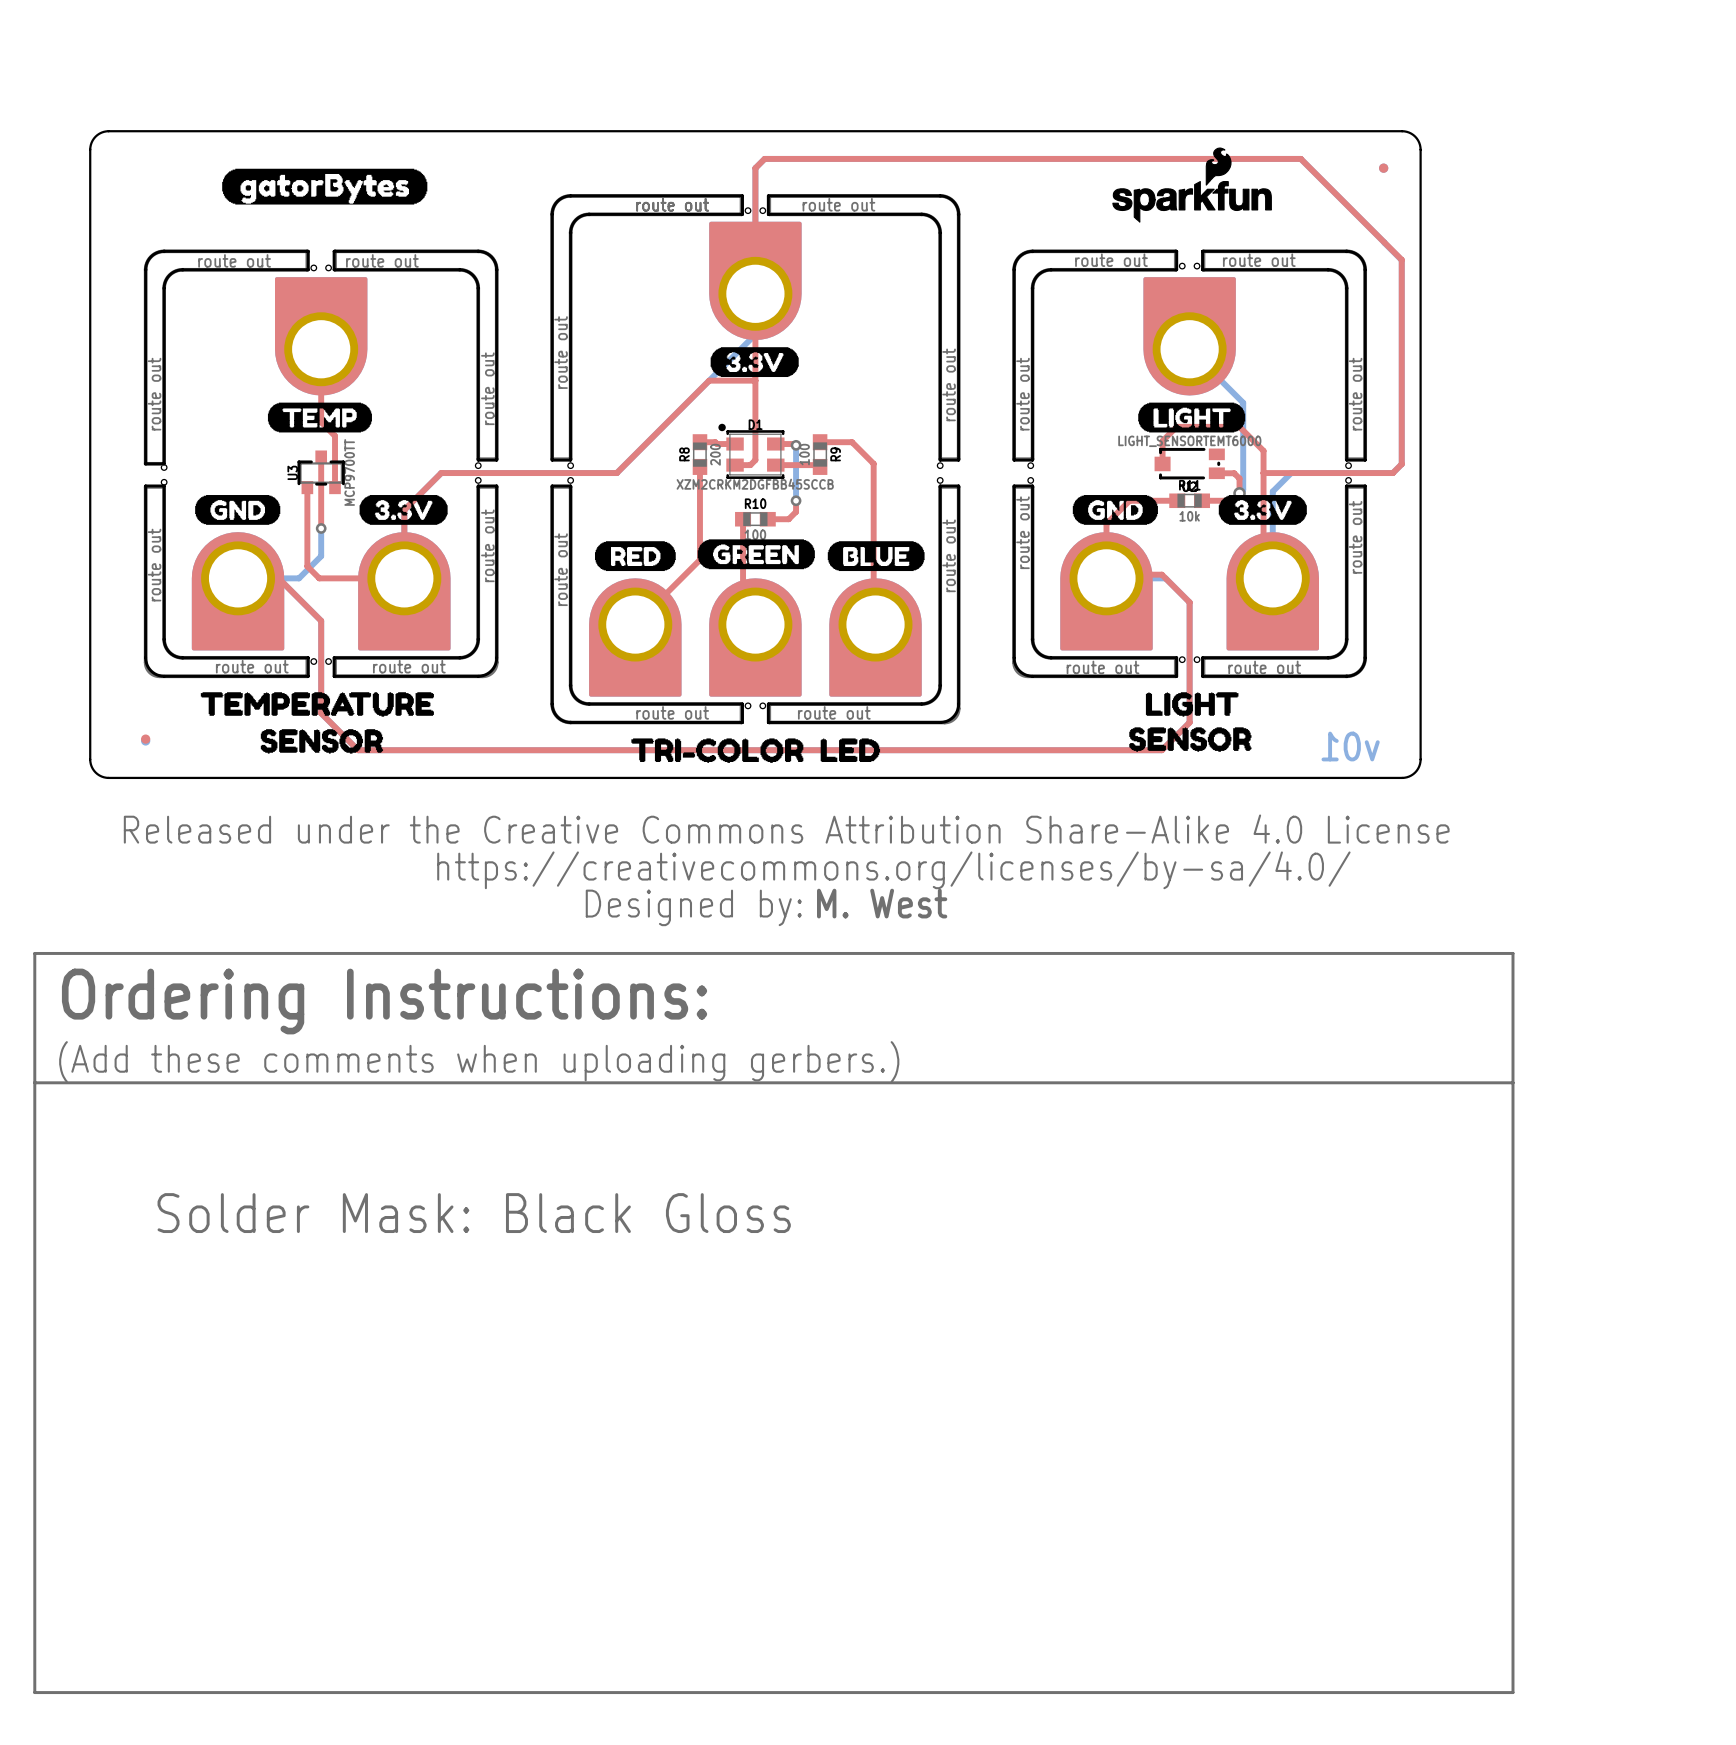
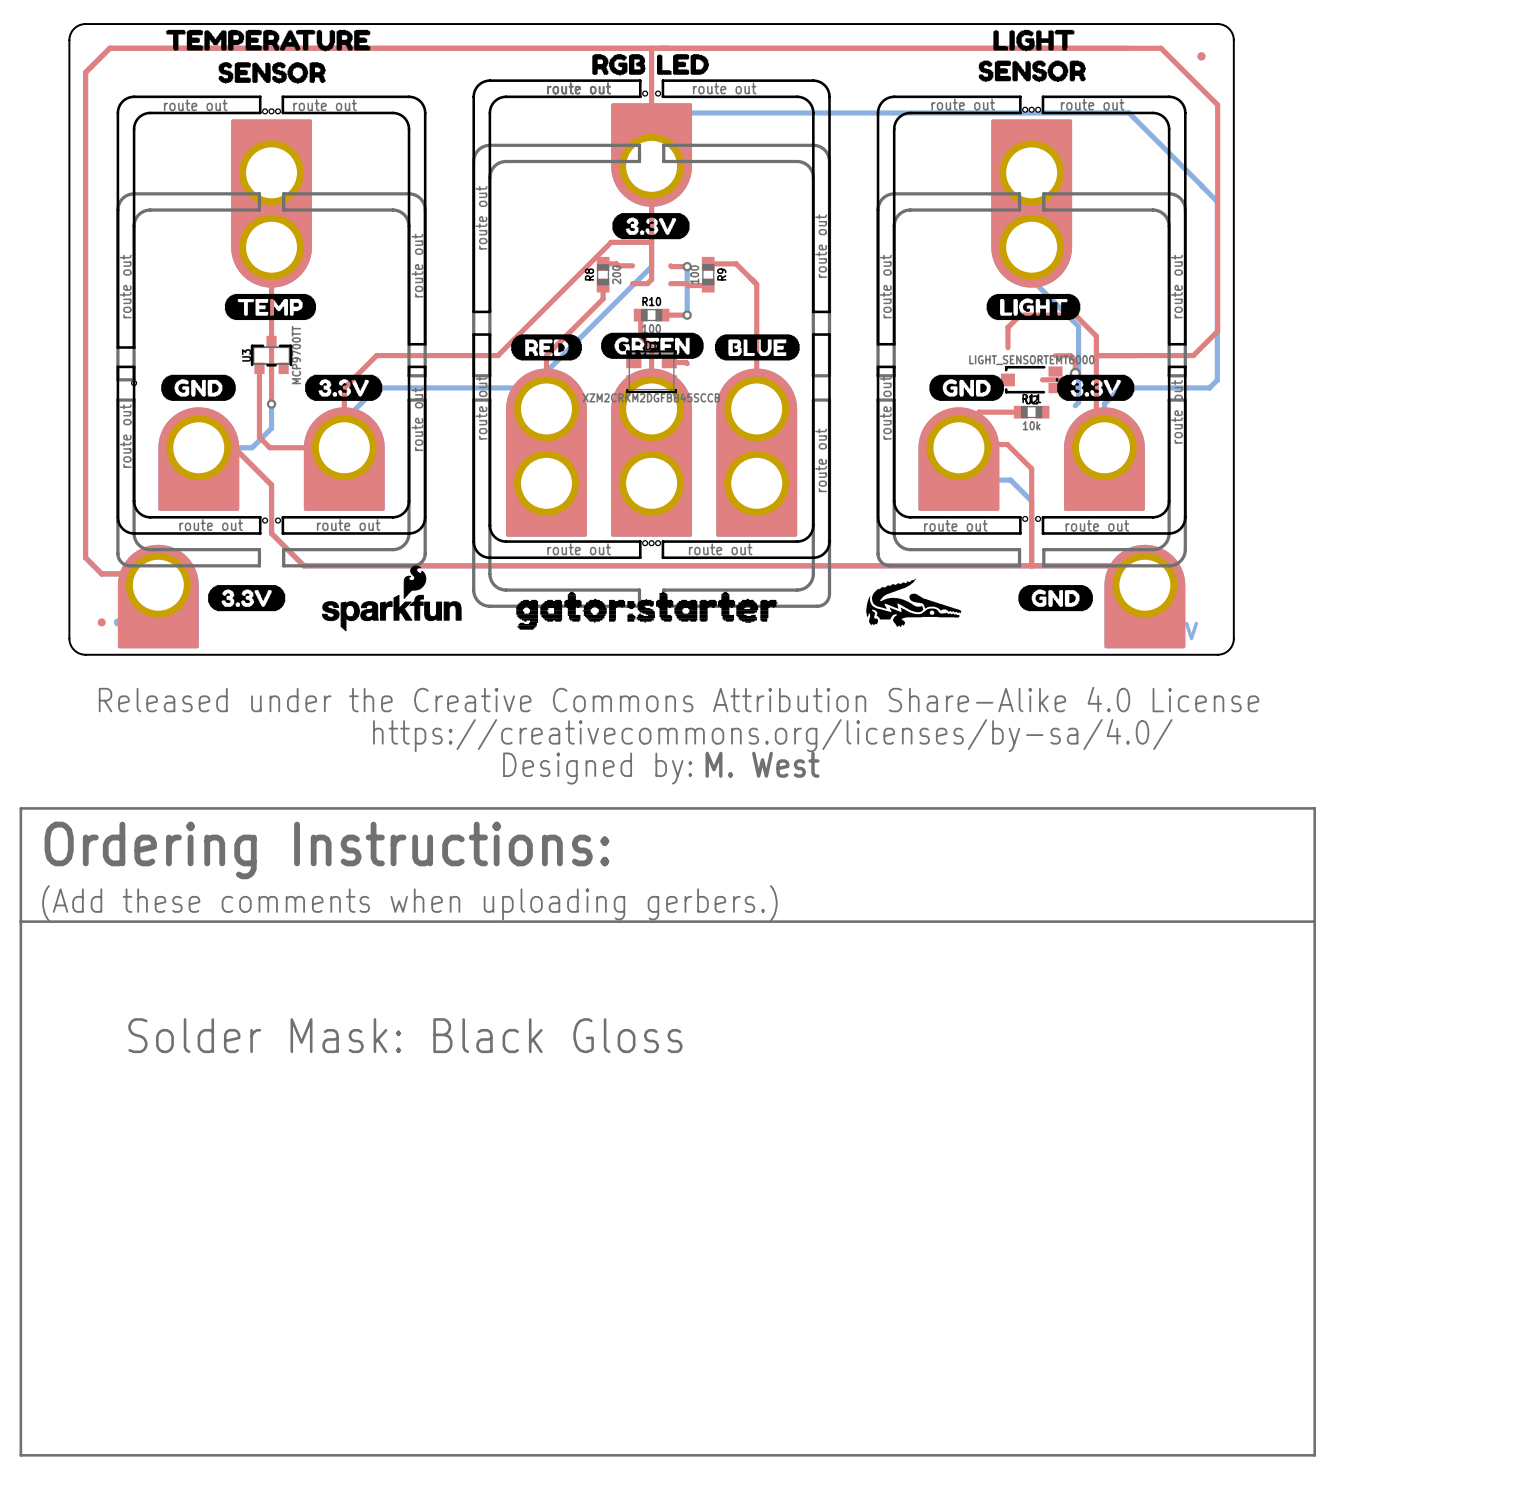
drawing: none -> [166, 29, 371, 84]
drawing: none -> [978, 29, 1086, 83]
drawing: none -> [592, 54, 709, 76]
text: none -> route out (579, 88)
hole: none -> (645, 93)
hole: none -> (658, 93)
drawing: [1112, 147, 1272, 223] -> none
board edge: (90, 149) (95, 136) (108, 131) (1402, 131) (1415, 136) (1420, 149) -> (69, 104) (69, 36) (75, 27) (85, 24) (1219, 24) (1229, 28) (1233, 38) (1233, 104)
text: none -> route out (963, 104)
text: none -> route out (1092, 104)
text: none -> route out (195, 105)
text: none -> route out (325, 105)
hole: none -> (1025, 109)
hole: none -> (1031, 109)
hole: none -> (1038, 109)
hole: none -> (265, 111)
hole: none -> (271, 111)
hole: none -> (278, 111)
drawing: [222, 168, 428, 205] -> none
top track: (755, 168) (764, 158) (1300, 158) (1401, 259) (1401, 464) (1392, 473) (1263, 473) -> (651, 121) (651, 48)
part position: (1383, 168) -> (1201, 56)
text: route out (672, 204) -> none
text position: route out (838, 204) -> route out (724, 88)
hole: (748, 210) -> none
hole: (762, 210) -> none
board edge: (552, 214) (555, 203) (568, 196) (742, 195) (742, 214) (586, 214) (574, 221) (570, 232) -> (473, 161) (473, 94) (477, 86) (483, 81) (640, 80) (640, 96) (506, 96) (497, 98) (492, 104) (490, 110) (489, 177)
board edge: (958, 214) (954, 203) (942, 196) (768, 195) (768, 214) (924, 214) (936, 221) (940, 232) -> (829, 161) (829, 94) (826, 86) (819, 81) (662, 80) (662, 96) (797, 96) (805, 98) (811, 104) (813, 110) (813, 177)
text: route out (234, 260) -> none
text: route out (382, 260) -> none
text: route out (1111, 260) -> none
text: route out (1259, 260) -> none
part: none -> (271, 203)
part: none -> (1031, 203)
hole: (1182, 266) -> none
hole: (1197, 266) -> none
hole: (313, 267) -> none
hole: (328, 267) -> none
board edge: (145, 269) (149, 258) (161, 251) (308, 251) (308, 269) (180, 269) (167, 277) (164, 288) -> (117, 210) (117, 112) (120, 104) (124, 100) (134, 96) (260, 96) (260, 112) (150, 112) (138, 117) (134, 129) (134, 226)
board edge: (496, 269) (492, 258) (480, 251) (334, 251) (334, 269) (462, 269) (474, 277) (478, 288) -> (425, 210) (425, 112) (423, 104) (418, 100) (409, 96) (282, 96) (282, 112) (392, 112) (404, 117) (409, 129) (409, 226)
board edge: (1014, 269) (1017, 258) (1030, 251) (1176, 251) (1176, 269) (1048, 269) (1036, 277) (1032, 288) -> (878, 210) (878, 112) (880, 104) (884, 100) (894, 96) (1020, 96) (1020, 112) (910, 112) (898, 117) (894, 129) (894, 226)
board edge: (1365, 269) (1361, 258) (1349, 251) (1202, 251) (1202, 269) (1330, 269) (1342, 277) (1346, 288) -> (1185, 210) (1185, 112) (1183, 104) (1178, 100) (1169, 96) (1042, 96) (1042, 112) (1152, 112) (1164, 117) (1169, 129) (1169, 226)
part position: (755, 280) -> (651, 155)
top track: none -> (603, 263) (632, 265)
top track: none -> (708, 263) (736, 263) (756, 284) (756, 408)
top track: none -> (670, 265) (687, 266)
via: none -> (687, 266)
part: (321, 336) -> none
part: (1189, 336) -> none
top track: (755, 349) (755, 426) -> (640, 315) (640, 336) (651, 347)
top track: none -> (651, 279) (647, 283) (632, 283)
text position: route out (561, 352) -> route out (481, 217)
top track: none -> (670, 283) (708, 285) (706, 283)
top track: none -> (603, 285) (603, 298) (546, 355) (546, 408)
drawing position: (754, 362) -> (650, 226)
top track: (755, 380) (709, 380) (616, 473) (441, 473) (404, 510) -> (651, 242) (611, 242) (497, 355) (376, 355) (344, 387) (344, 420)
text position: route out (949, 384) -> route out (821, 246)
board edge: (552, 386) (552, 412) -> (473, 311) (489, 311)
board edge: (570, 386) (570, 412) -> (473, 334) (489, 334)
board edge: (940, 386) (940, 412) -> (813, 311) (829, 311)
board edge: (958, 386) (958, 412) -> (813, 334) (829, 334)
text position: route out (487, 388) -> route out (417, 265)
top track: none -> (662, 315) (687, 315)
via: none -> (687, 315)
text position: route out (154, 394) -> route out (125, 286)
text position: route out (1022, 394) -> route out (885, 286)
text position: route out (1355, 394) -> route out (1176, 286)
drawing position: (319, 417) -> (270, 306)
drawing position: (1191, 417) -> (1033, 306)
top track: (321, 422) (335, 436) (335, 487) -> (271, 343) (271, 373)
board edge: (478, 423) (478, 449) -> (409, 344) (425, 344)
board edge: (496, 423) (496, 449) -> (409, 366) (425, 366)
board edge: (1014, 423) (1014, 449) -> (878, 344) (894, 344)
board edge: (1032, 423) (1032, 449) -> (878, 366) (894, 366)
board edge: (1346, 423) (1346, 449) -> (1169, 344) (1185, 344)
board edge: (1365, 423) (1365, 449) -> (1169, 366) (1185, 366)
board edge: (145, 426) (145, 449) -> (117, 347) (134, 347)
board edge: (164, 426) (164, 449) -> (117, 366) (134, 366)
top track: none -> (1096, 355) (1193, 355) (1217, 331) (1217, 104) (1161, 48) (109, 48) (85, 72) (85, 557) (101, 573) (147, 573) (158, 585)
top track: (699, 442) (735, 444) -> none
top track: (820, 442) (852, 442) (873, 463) (873, 622) (875, 624) -> none
bottom track: (796, 445) (796, 500) -> (687, 266) (687, 315)
via: (796, 445) -> none
top track: (1263, 450) (1239, 426) (1176, 426) (1162, 440) (1162, 463) -> (1096, 368) (1096, 336) (1075, 315) (1020, 315) (1007, 327) (1007, 347)
R8 position: (699, 454) -> (603, 274)
R9 position: (820, 454) -> (708, 274)
board edge: (478, 460) (496, 460) -> (409, 376) (409, 399)
board edge: (552, 460) (570, 460) -> (473, 376) (473, 399)
board edge: (940, 460) (958, 460) -> (813, 376) (813, 399)
board edge: (1014, 460) (1032, 460) -> (878, 376) (878, 399)
board edge: (1346, 460) (1365, 460) -> (1169, 376) (1169, 399)
board edge: (145, 463) (164, 463) -> (117, 379) (117, 399)
hole: (478, 465) -> none
hole: (570, 465) -> none
top track: (775, 465) (818, 465) (820, 466) -> none
hole: (940, 465) -> none
hole: (1030, 465) -> none
hole: (1348, 465) -> none
top track: (699, 466) (699, 559) (635, 624) -> none
U3 position: (321, 472) -> (271, 354)
top track: (1216, 473) (1234, 473) (1239, 478) (1239, 493) (1232, 500) (1202, 500) -> (1055, 355) (1070, 355) (1075, 360) (1075, 373) (1068, 379) (1042, 379)
hole: (478, 480) -> none
hole: (570, 480) -> none
hole: (940, 480) -> none
hole: (1030, 480) -> none
hole: (1348, 480) -> none
hole: (164, 482) -> none
board edge: (145, 485) (164, 485) -> (134, 379) (134, 399)
board edge: (478, 485) (496, 485) -> (425, 376) (425, 399)
board edge: (552, 485) (570, 485) -> (489, 376) (489, 399)
board edge: (940, 485) (958, 485) -> (829, 376) (829, 399)
board edge: (1014, 485) (1032, 485) -> (894, 376) (894, 399)
board edge: (1346, 485) (1365, 485) -> (1185, 376) (1185, 399)
top track: (321, 491) (321, 528) -> (259, 368) (259, 400)
via position: (1239, 493) -> (1075, 373)
top track: (796, 500) (796, 511) (788, 519) (767, 519) -> none
via: (796, 500) -> none
drawing position: (237, 509) -> (198, 387)
drawing position: (403, 509) -> (343, 387)
drawing position: (1115, 509) -> (966, 387)
drawing position: (1262, 509) -> (1095, 387)
R10 position: (755, 519) -> (651, 315)
bottom track: (321, 528) (321, 556) (299, 578) (238, 578) -> (271, 404) (271, 428) (252, 447) (198, 447)
via position: (321, 528) -> (271, 404)
top track: (307, 529) (307, 566) (319, 578) (404, 578) (404, 541) -> (259, 437) (269, 447) (344, 447)
text position: route out (1022, 532) -> route out (885, 407)
text position: route out (1355, 537) -> route out (1176, 411)
top track: none -> (198, 447) (234, 447) (271, 484) (271, 533) (303, 565) (1125, 565) (1144, 585)
text position: route out (487, 545) -> route out (417, 419)
part: none -> (546, 452)
part: none -> (651, 452)
part: none -> (756, 452)
drawing position: (756, 554) -> (652, 345)
drawing position: (635, 556) -> (546, 347)
drawing position: (876, 556) -> (757, 347)
text position: route out (154, 565) -> route out (125, 436)
text position: route out (561, 569) -> route out (481, 407)
top track: (1119, 574) (1161, 574) (1189, 602) -> (970, 444) (1007, 444) (1031, 468) (1031, 501)
top track: (238, 578) (278, 578) (321, 620) (321, 713) (358, 750) (1161, 750) (1189, 722) (1189, 676) -> none
part position: (238, 591) -> (198, 459)
part position: (404, 591) -> (344, 459)
part position: (1106, 591) -> (958, 459)
part position: (1272, 591) -> (1104, 459)
board edge: (164, 602) (164, 641) (166, 648) (173, 655) (182, 657) (308, 657) (308, 676) (157, 674) (149, 669) (146, 662) (145, 620) -> (134, 501) (137, 510) (148, 517) (260, 517) (260, 533) (131, 533) (121, 527) (117, 517)
board edge: (478, 602) (478, 641) (475, 648) (469, 655) (459, 657) (334, 657) (334, 676) (485, 674) (492, 669) (496, 662) (496, 620) -> (409, 501) (405, 510) (394, 517) (282, 517) (282, 533) (411, 533) (421, 527) (425, 517)
board edge: (1032, 602) (1032, 641) (1035, 648) (1041, 655) (1051, 657) (1176, 657) (1176, 676) (1025, 674) (1017, 669) (1014, 662) (1014, 620) -> (894, 501) (897, 510) (908, 517) (1020, 517) (1020, 533) (892, 533) (881, 527) (878, 517)
board edge: (1346, 602) (1346, 641) (1344, 648) (1337, 655) (1328, 657) (1202, 657) (1202, 676) (1353, 674) (1361, 669) (1364, 662) (1365, 620) -> (1169, 501) (1165, 510) (1155, 517) (1042, 517) (1042, 533) (1171, 533) (1181, 527) (1185, 517)
hole: none -> (1025, 518)
hole: none -> (1038, 518)
hole: none -> (265, 520)
hole: none -> (278, 520)
text: none -> route out (211, 525)
board edge: (570, 630) (570, 687) (573, 694) (579, 701) (589, 704) (742, 704) (742, 722) (563, 721) (555, 715) (552, 706) (552, 648) -> (489, 525) (493, 535) (503, 541) (640, 541) (640, 557) (487, 557) (477, 551) (473, 541)
board edge: (940, 630) (940, 687) (937, 694) (930, 701) (921, 704) (768, 704) (768, 722) (947, 721) (954, 715) (958, 706) (958, 648) -> (813, 525) (809, 535) (799, 541) (662, 541) (662, 557) (815, 557) (826, 551) (829, 541)
part: (635, 637) -> none
part: (755, 637) -> none
part: (875, 637) -> none
hole: none -> (645, 543)
hole: none -> (651, 543)
hole: none -> (658, 543)
text: none -> route out (579, 549)
hole: (1182, 659) -> none
hole: (1197, 659) -> none
hole: (313, 661) -> none
hole: (328, 661) -> none
text: route out (252, 666) -> none
text position: route out (409, 666) -> route out (348, 525)
text position: route out (1103, 667) -> route out (955, 525)
text position: route out (1264, 667) -> route out (1097, 525)
drawing: none -> [321, 565, 462, 632]
drawing: none -> [866, 578, 962, 628]
drawing: [200, 692, 434, 754] -> none
drawing: [1129, 692, 1252, 752] -> none
drawing: none -> [208, 585, 286, 612]
drawing: none -> [1018, 585, 1093, 612]
hole: (748, 705) -> none
hole: (762, 705) -> none
drawing: none -> [516, 591, 778, 630]
part: none -> (158, 596)
part: none -> (1144, 596)
text: route out (672, 712) -> none
text position: route out (834, 712) -> route out (720, 549)
drawing: [631, 738, 881, 763] -> none
part position: (145, 739) -> (101, 622)

